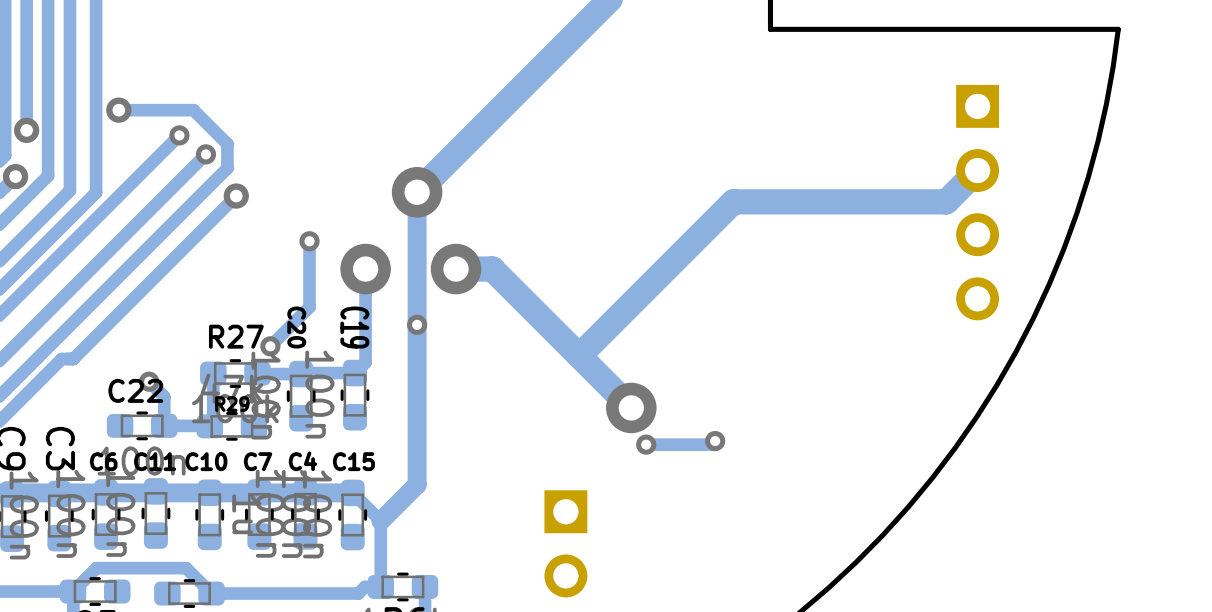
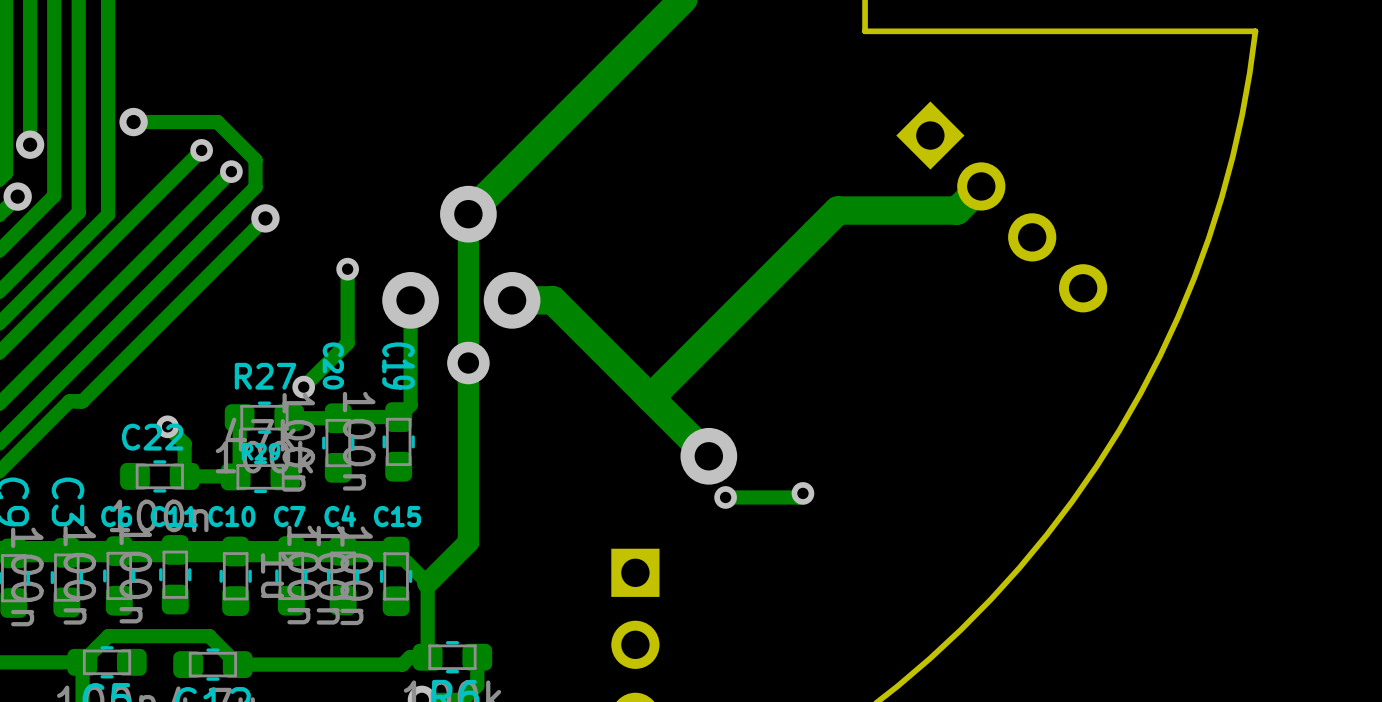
track: (977, 170) (946, 201) (733, 201) -> (981, 186) (957, 210) (837, 210) (823, 224)
part: none -> (1001, 206)
part: (977, 202) -> none
via size: [407, 314, 428, 335] -> [447, 341, 490, 385]

